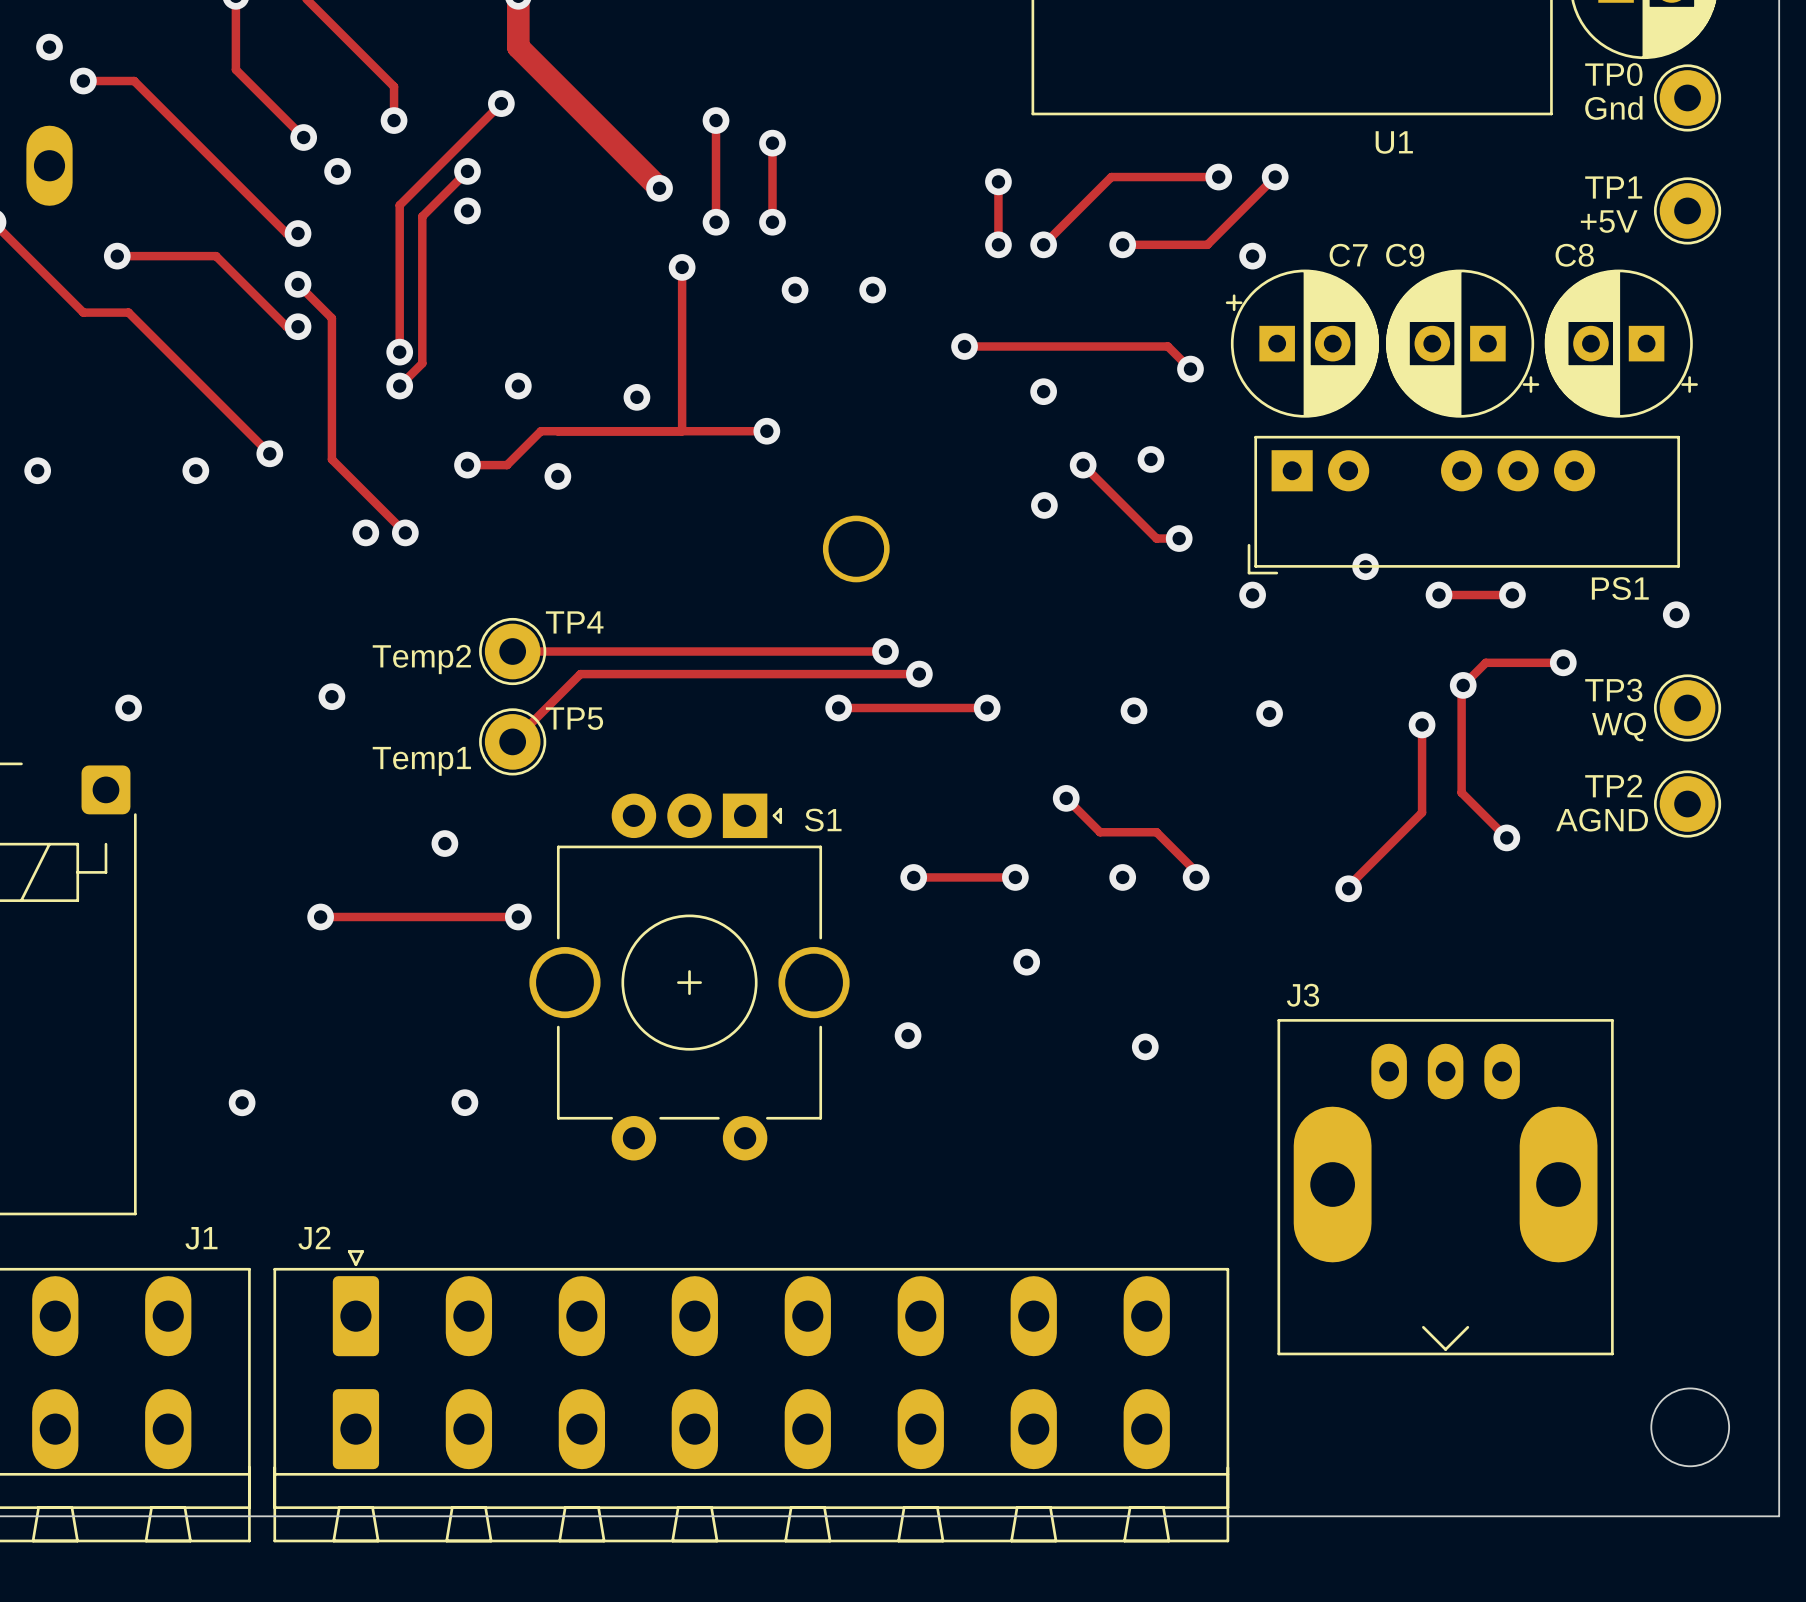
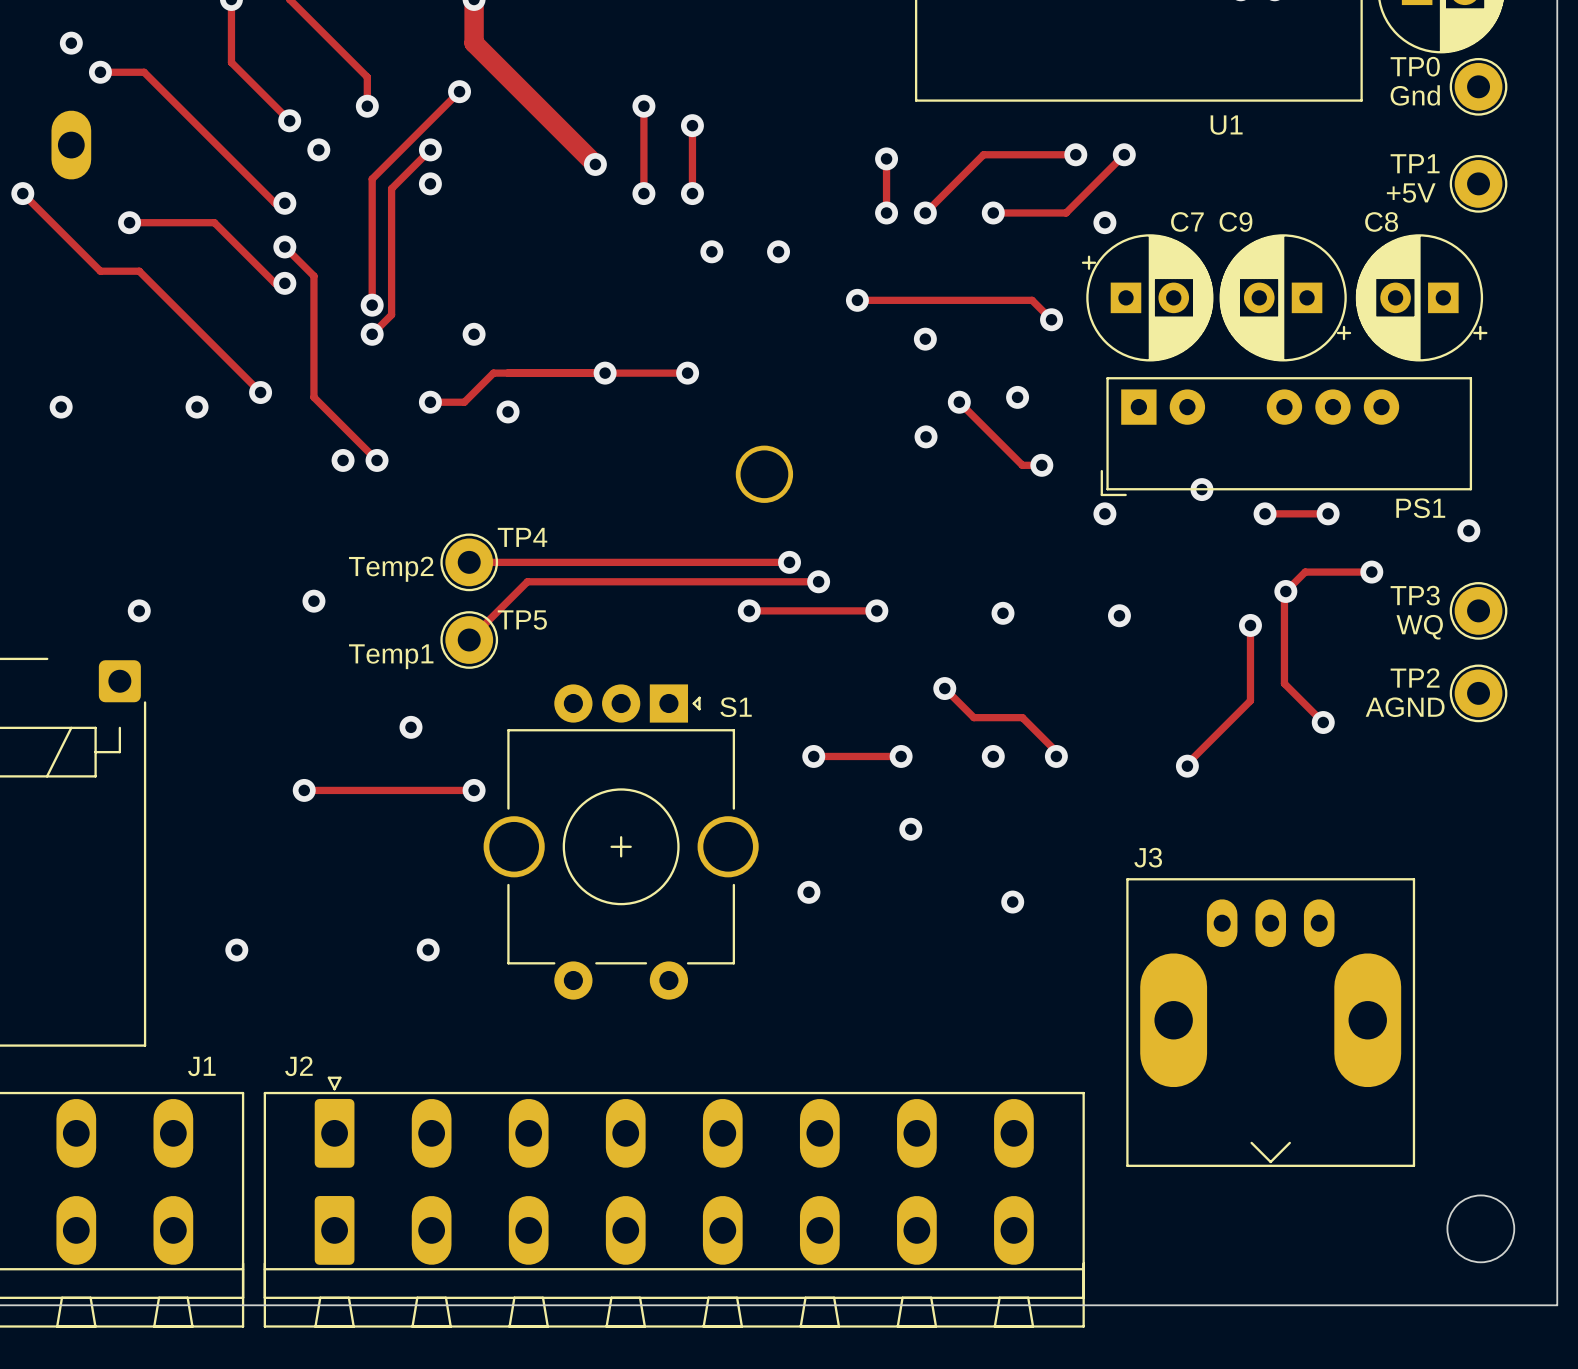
track: (682, 267) (682, 431) -> none
via: (682, 267) -> none
via position: (636, 397) -> (605, 373)

